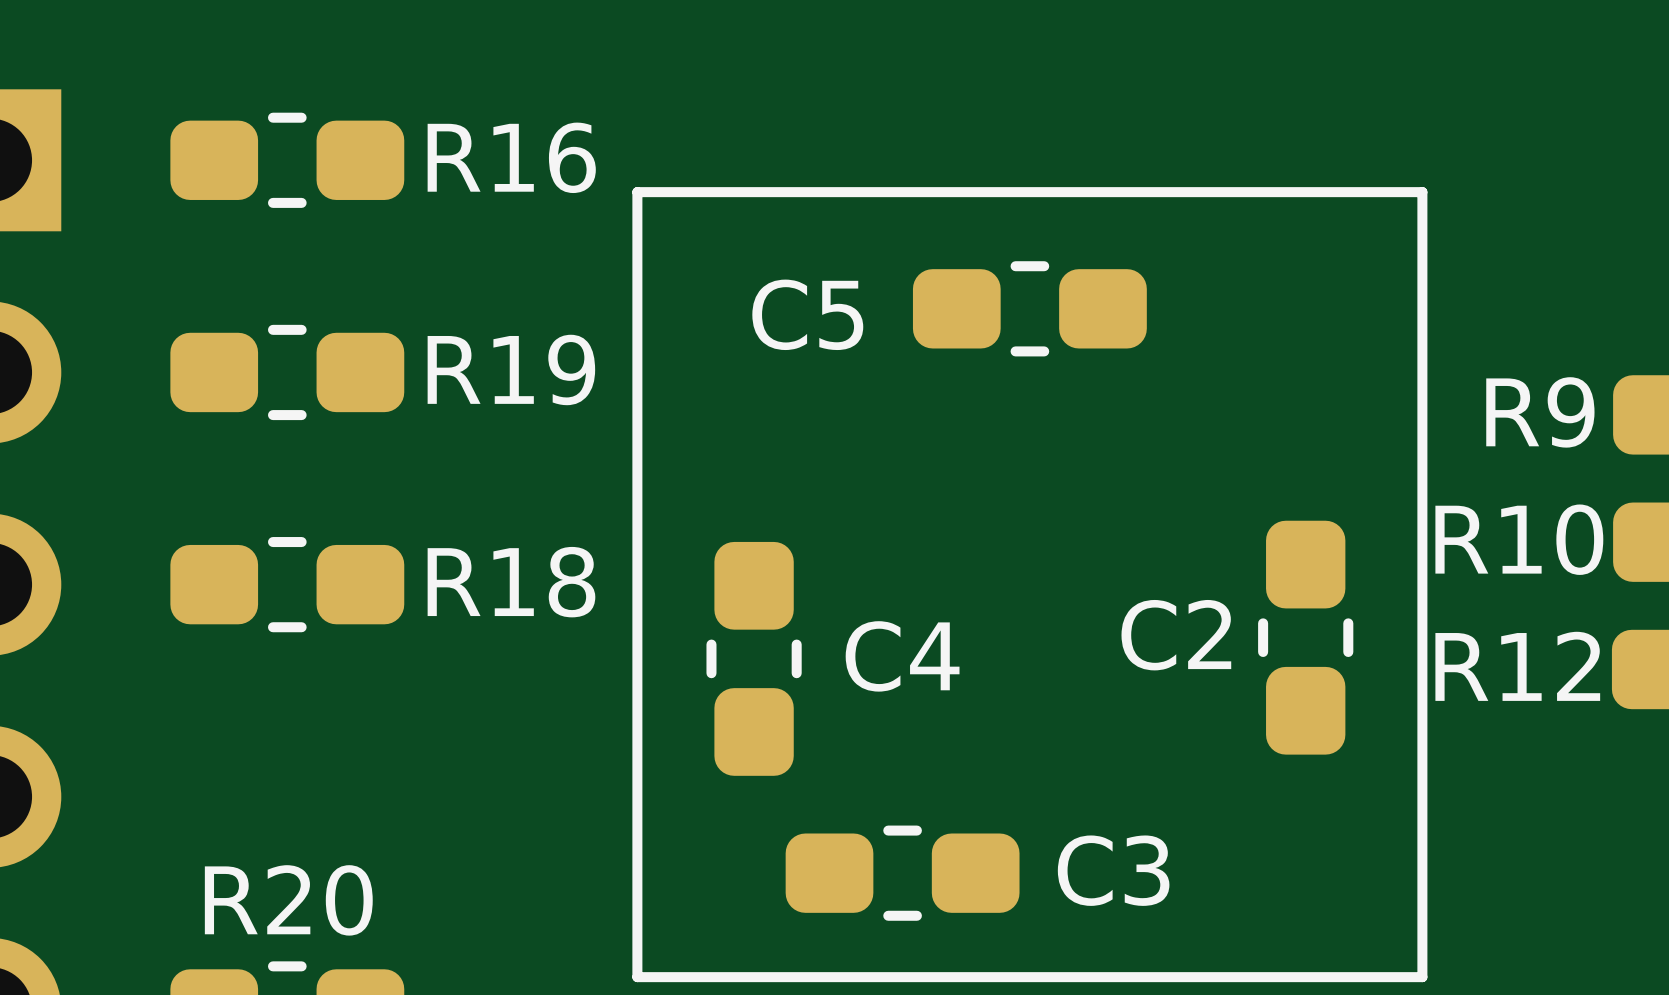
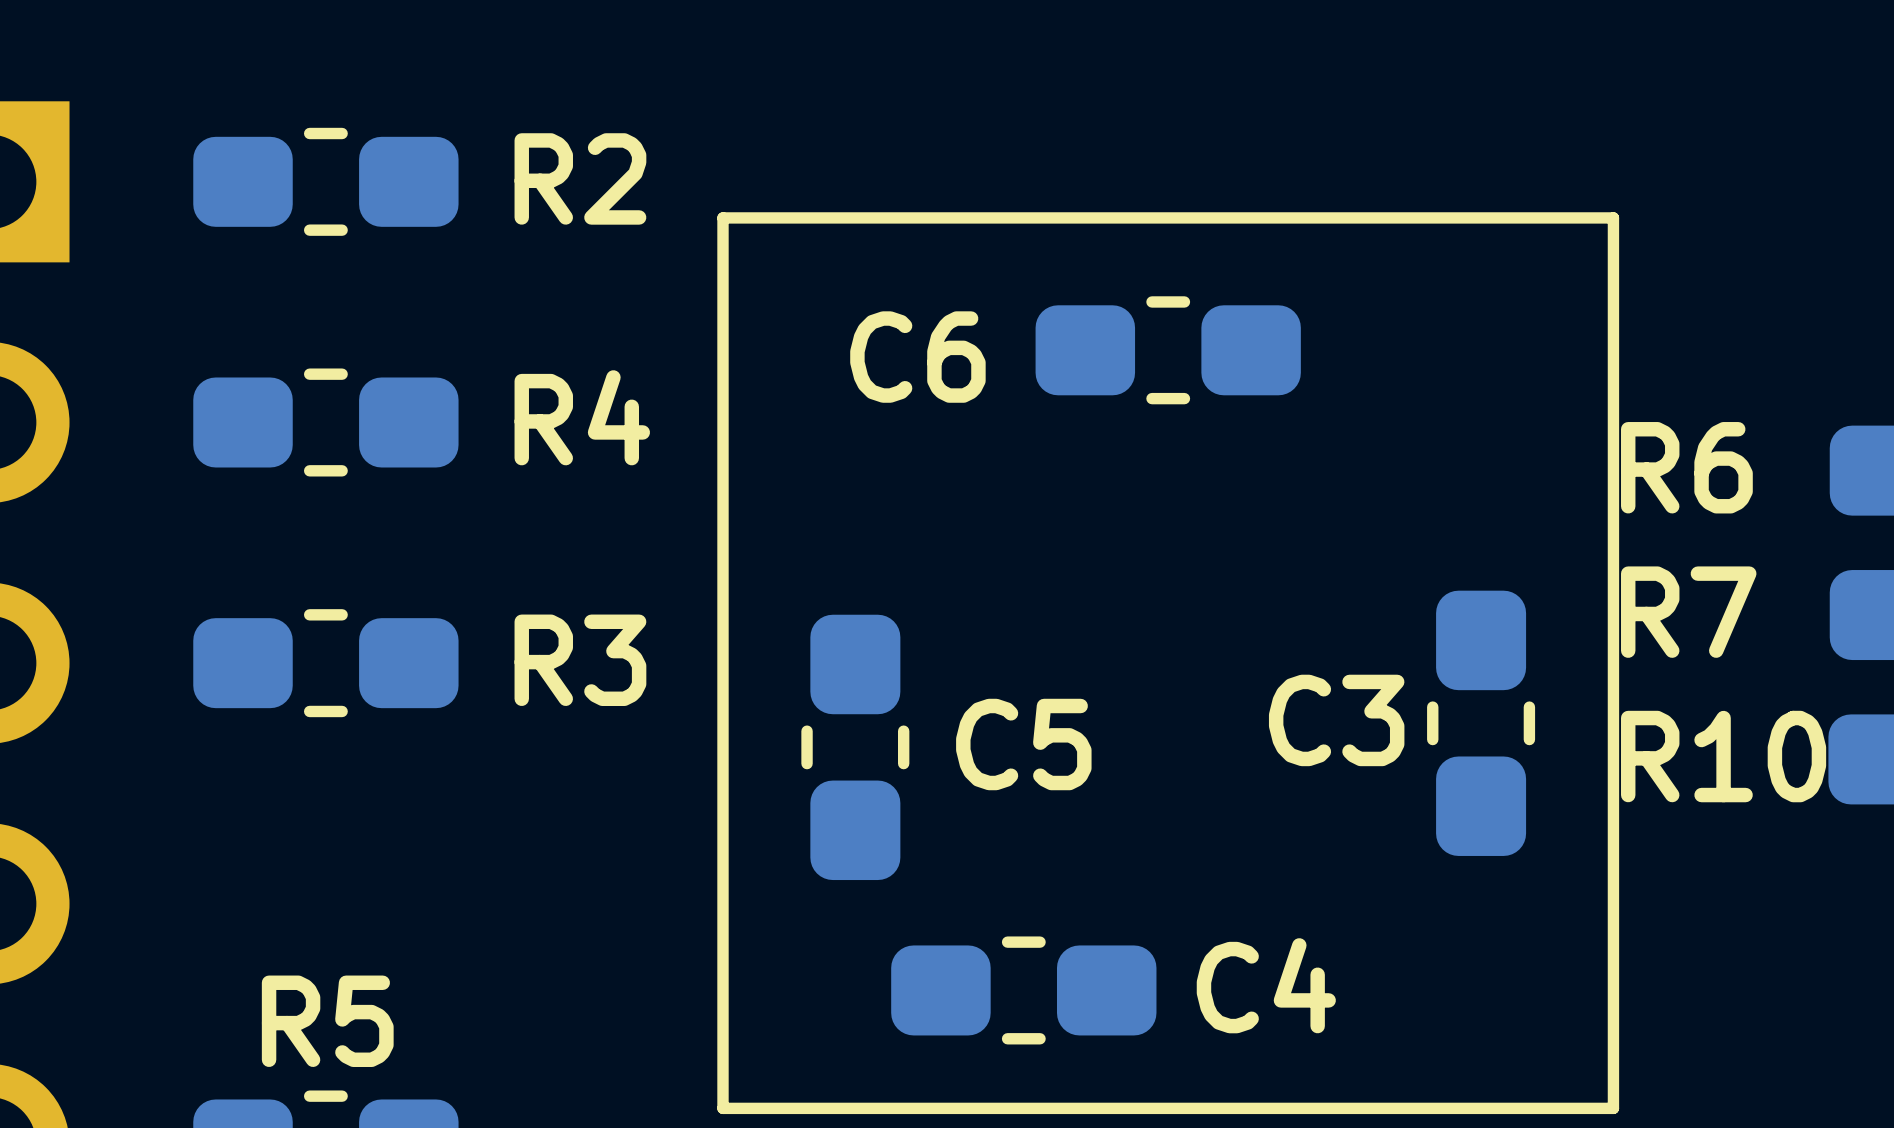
R16 name: R16 (511, 157) -> R2 (580, 178)
C5 name: C5 (807, 314) -> C6 (917, 357)
R19 name: R19 (511, 369) -> R4 (582, 417)
R9 name: R9 (1540, 412) -> R6 (1686, 467)
R10 name: R10 (1519, 539) -> R7 (1688, 612)
R18 name: R18 (511, 582) -> R3 (580, 660)
C2 name: C2 (1176, 635) -> C3 (1336, 720)
C4 name: C4 (902, 656) -> C5 (1023, 744)
R12 name: R12 (1517, 666) -> R10 (1723, 756)
C3 name: C3 (1113, 870) -> C4 (1266, 985)
R20 name: R20 (288, 900) -> R5 (327, 1021)

